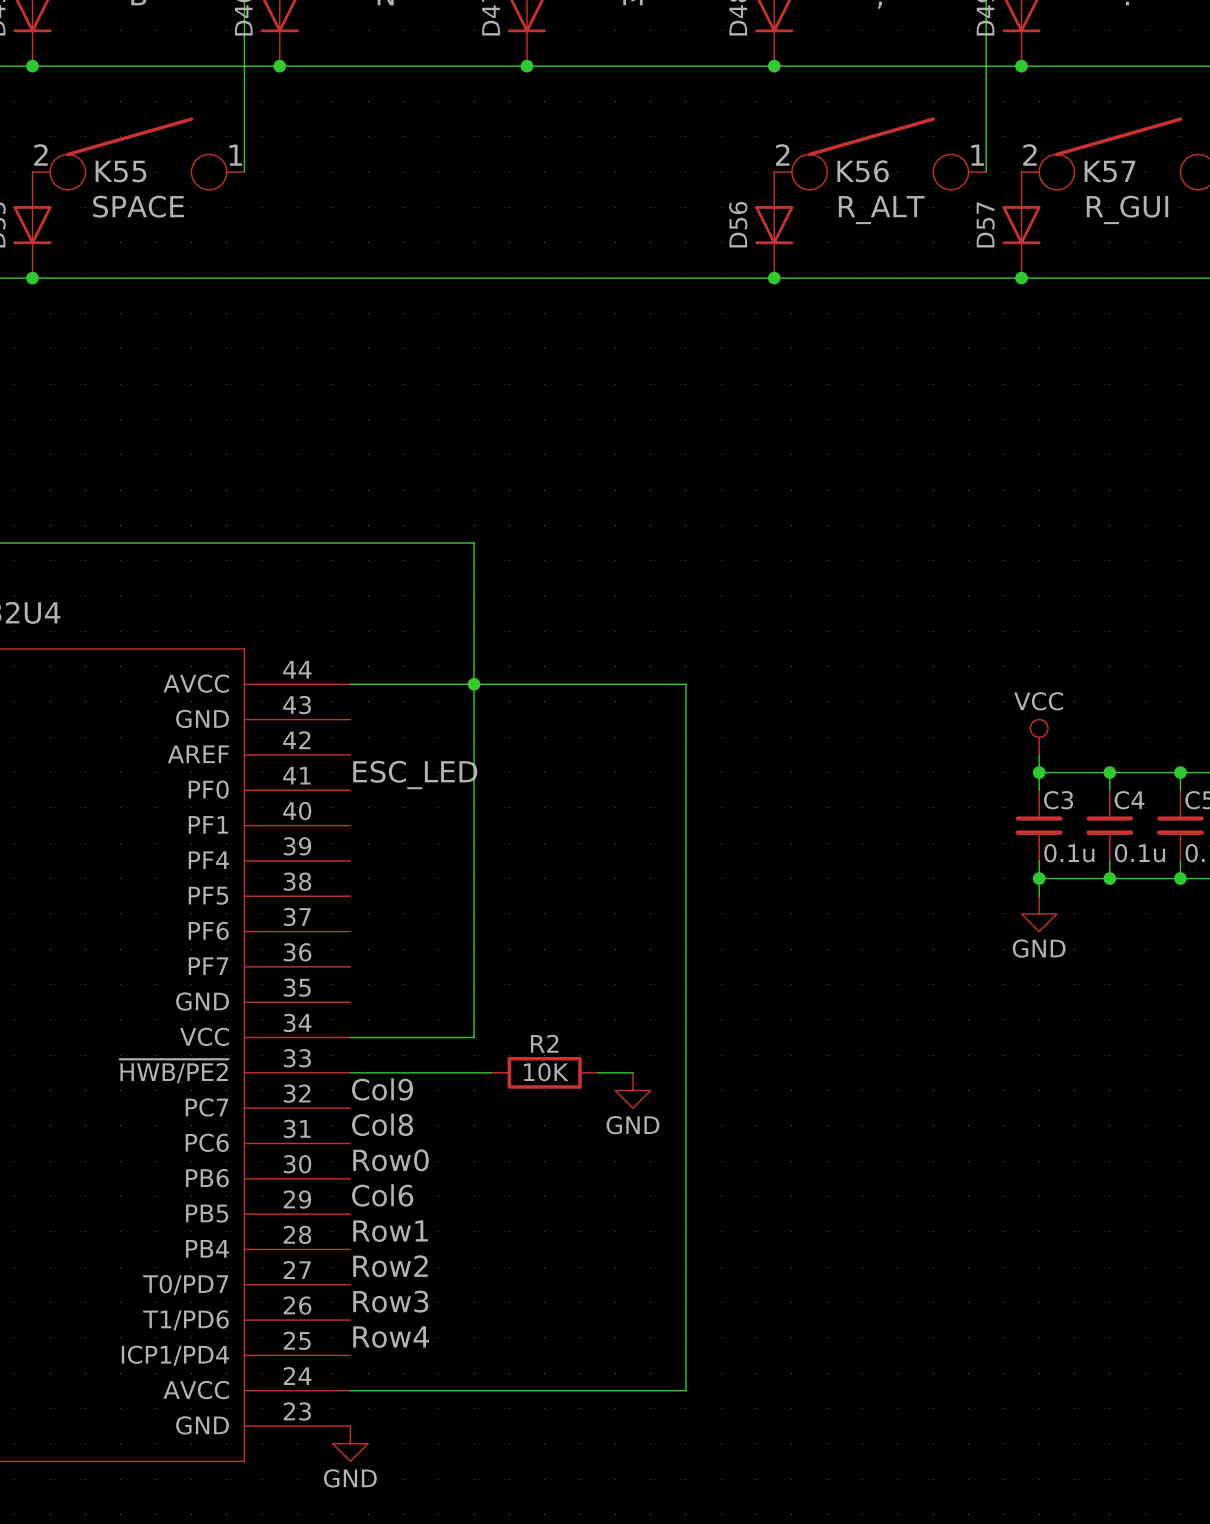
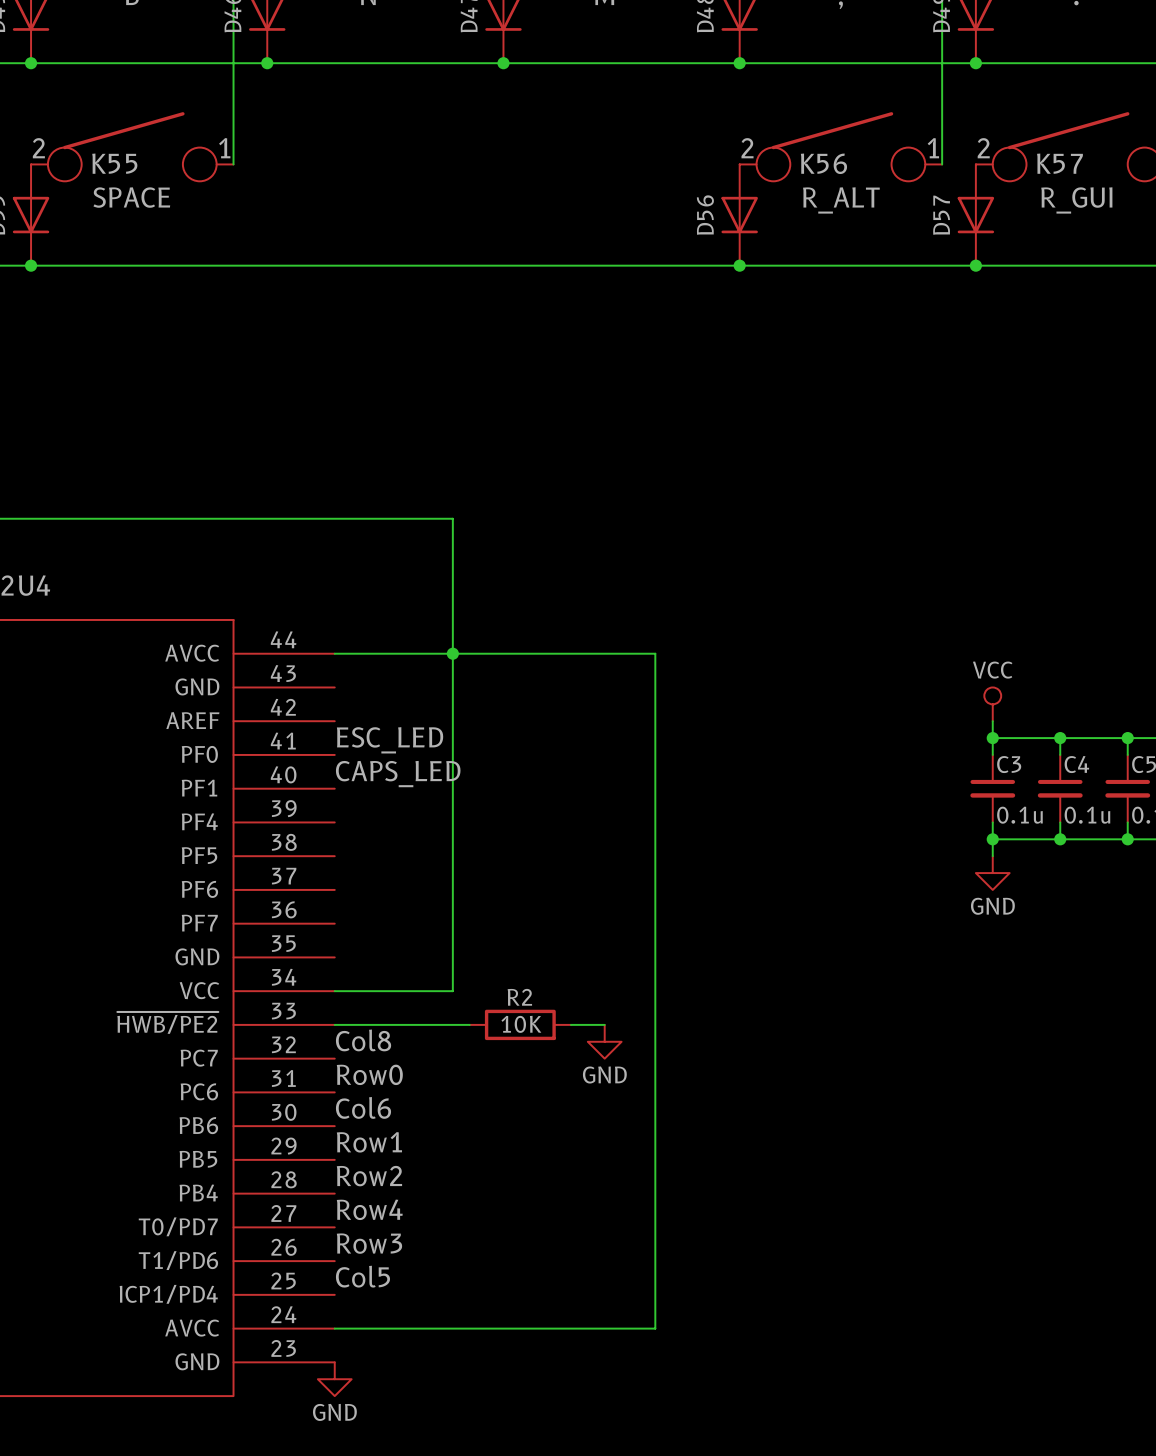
label: none -> CAPS_LED (398, 774)
label: Col9 (382, 1089) -> Col8 (363, 1040)
label: Col8 (382, 1124) -> Row0 (369, 1074)
label: Row0 (390, 1160) -> Col6 (363, 1107)
label: Col6 (382, 1195) -> Row1 (369, 1142)
label: Row1 (390, 1231) -> Row2 (369, 1176)
label: Row2 (390, 1266) -> Row4 (369, 1209)
label: Row4 (391, 1337) -> Col5 (362, 1276)

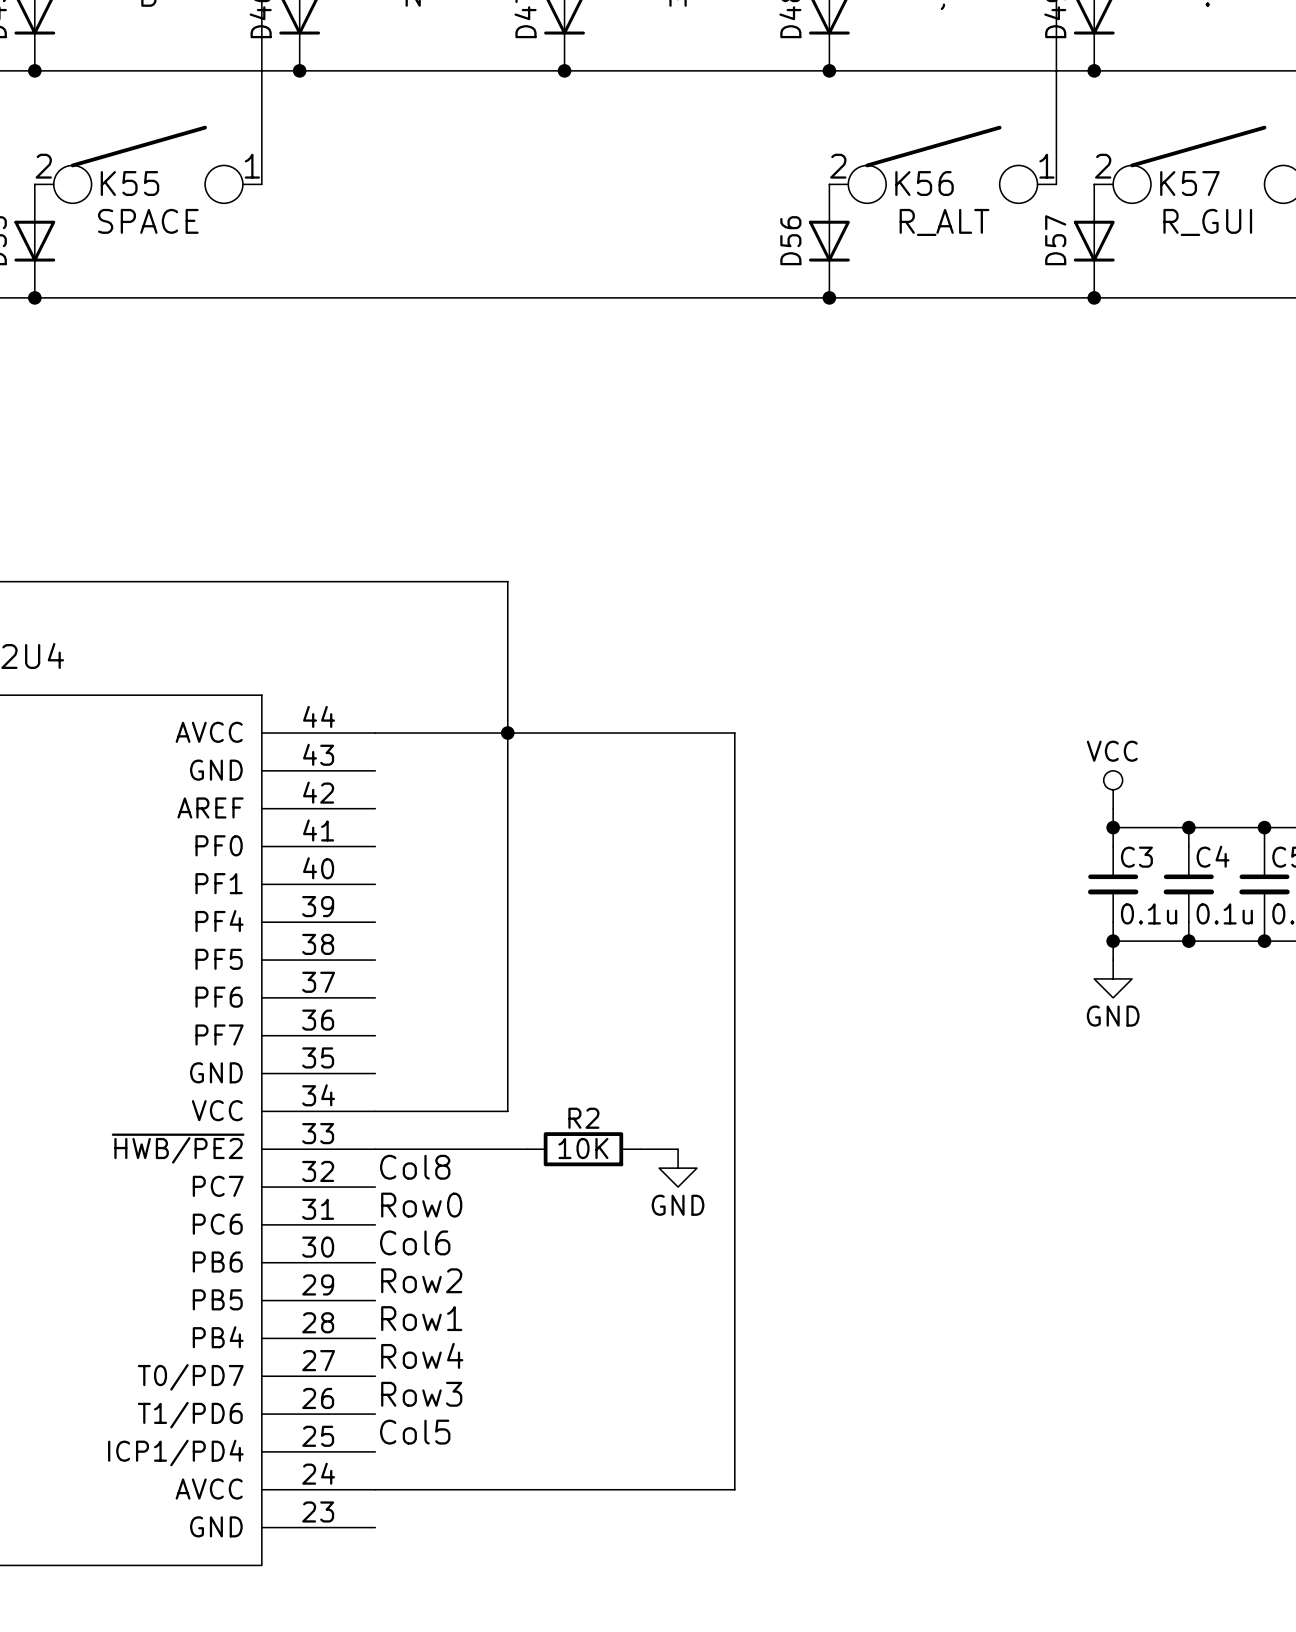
label: ESC_LED (390, 740) -> none
label: CAPS_LED (398, 774) -> none
label: Row1 (369, 1142) -> Row2 (421, 1280)
label: Row2 (369, 1176) -> Row1 (421, 1318)
power symbol: GND (334, 1379) -> none

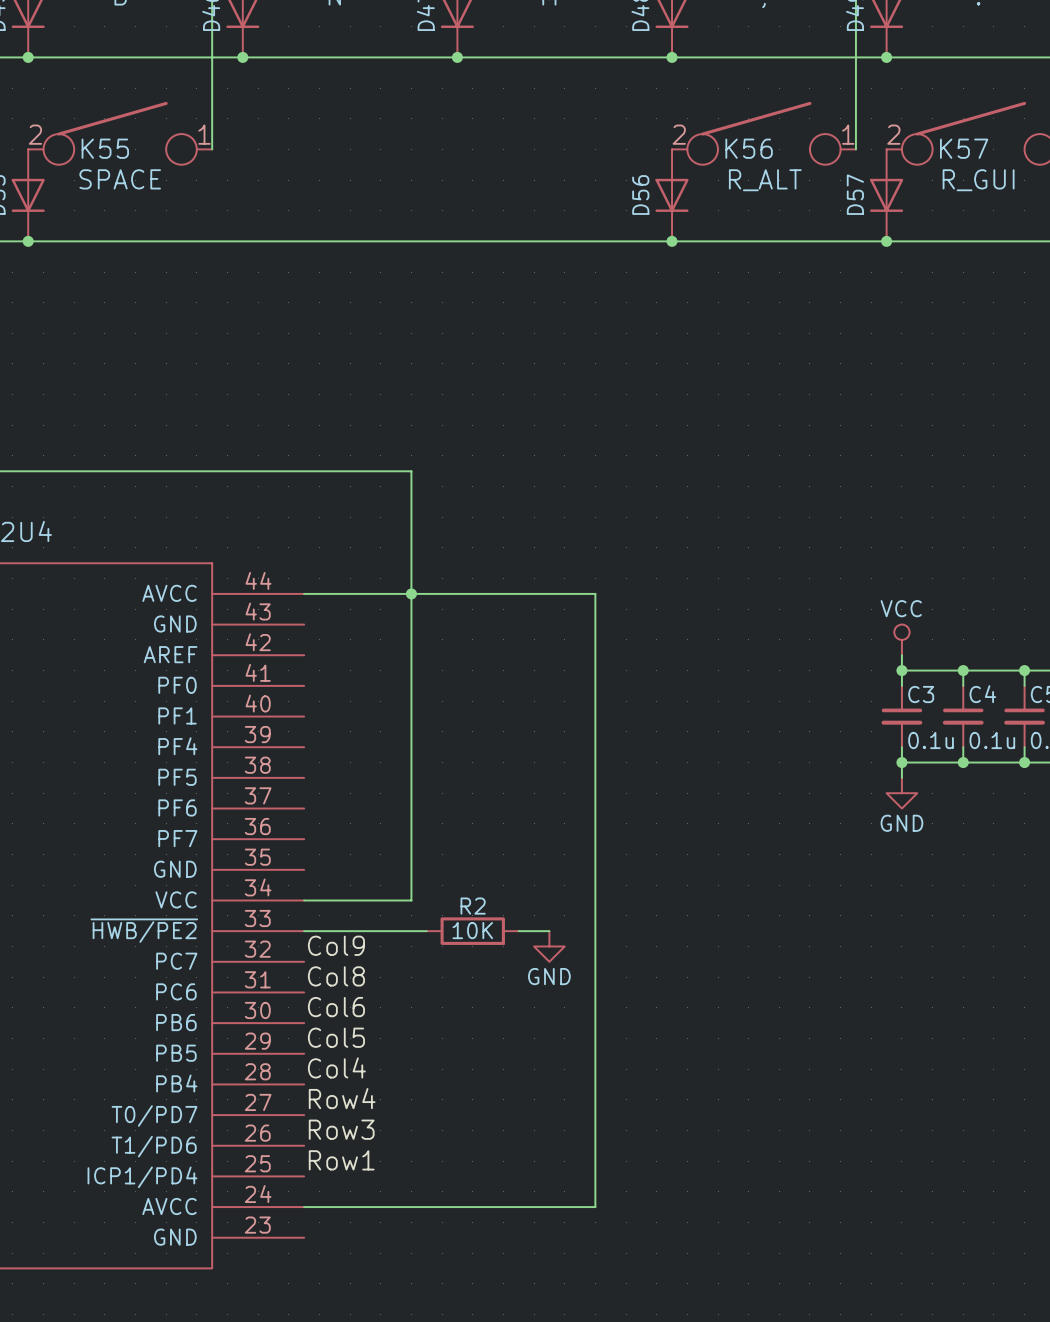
label: Col8 (415, 1167) -> Col9 (336, 945)
label: Row0 (421, 1205) -> Col8 (336, 976)
label: Row2 (421, 1280) -> Col5 (336, 1037)
label: Row1 (421, 1318) -> Col4 (336, 1067)
label: Col5 (415, 1432) -> Row1 (341, 1160)

